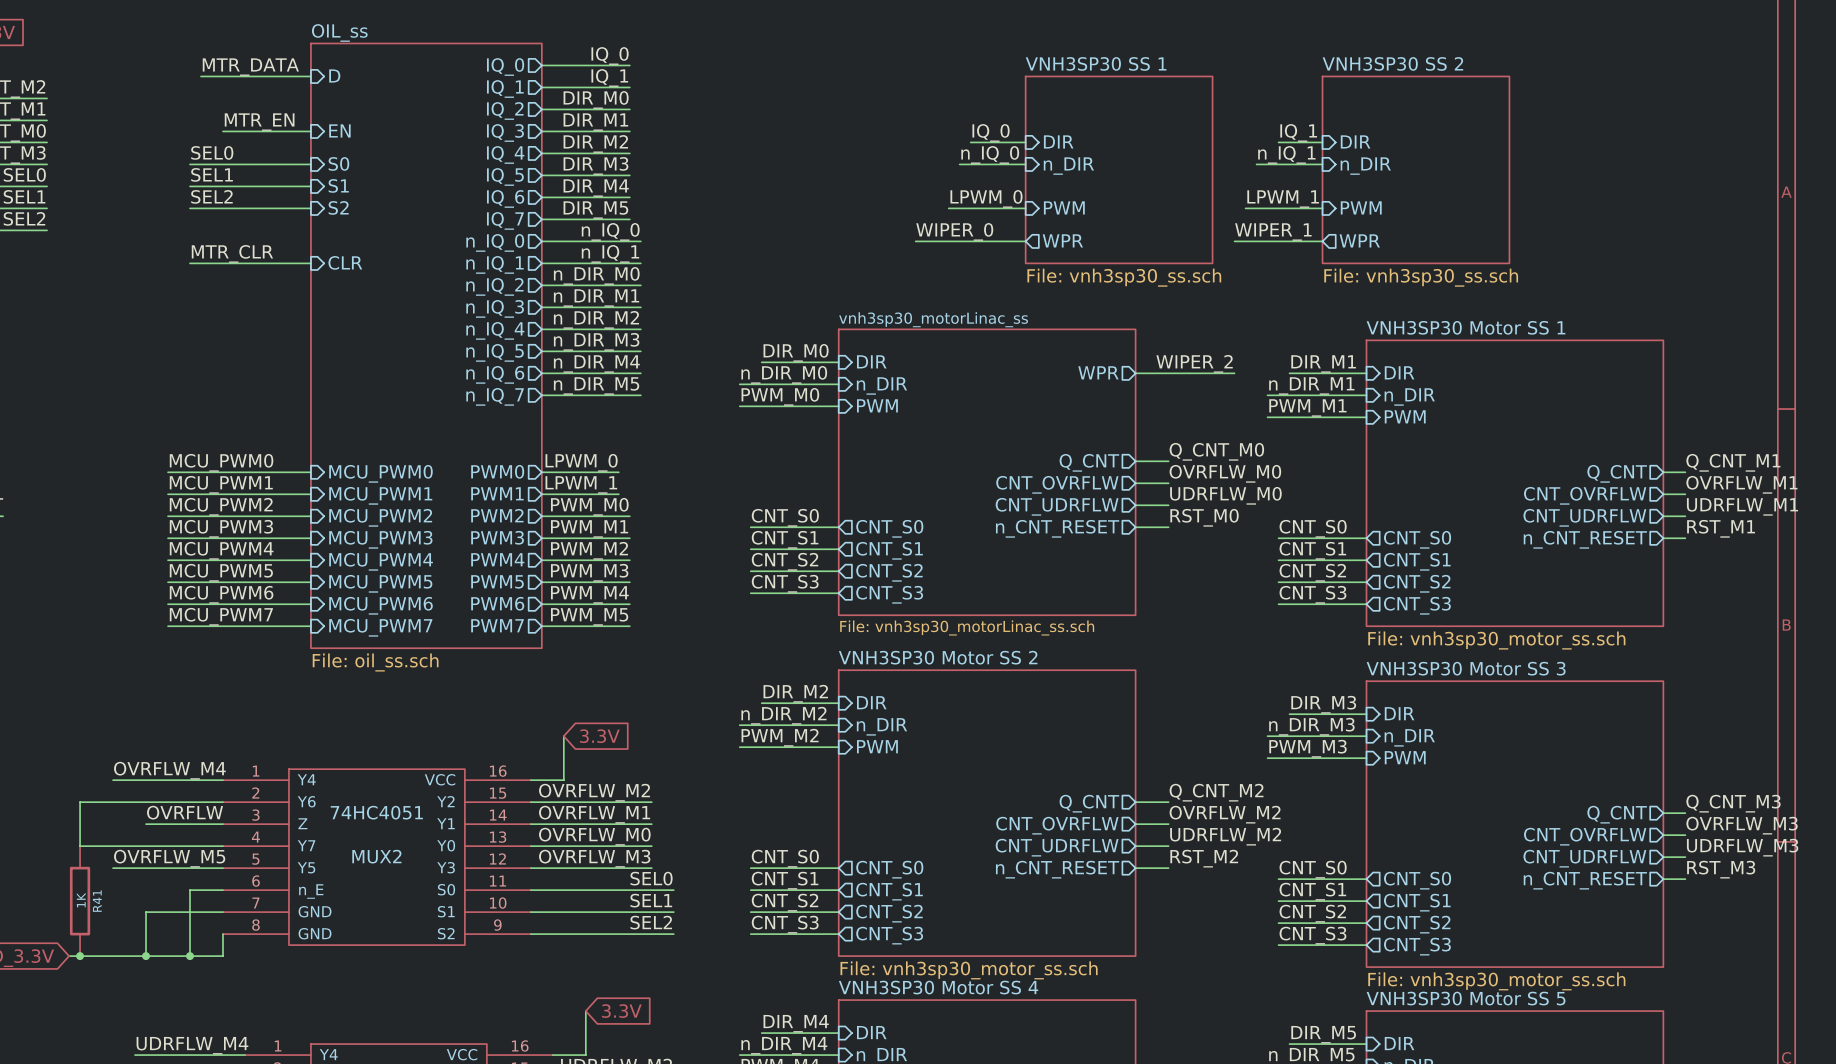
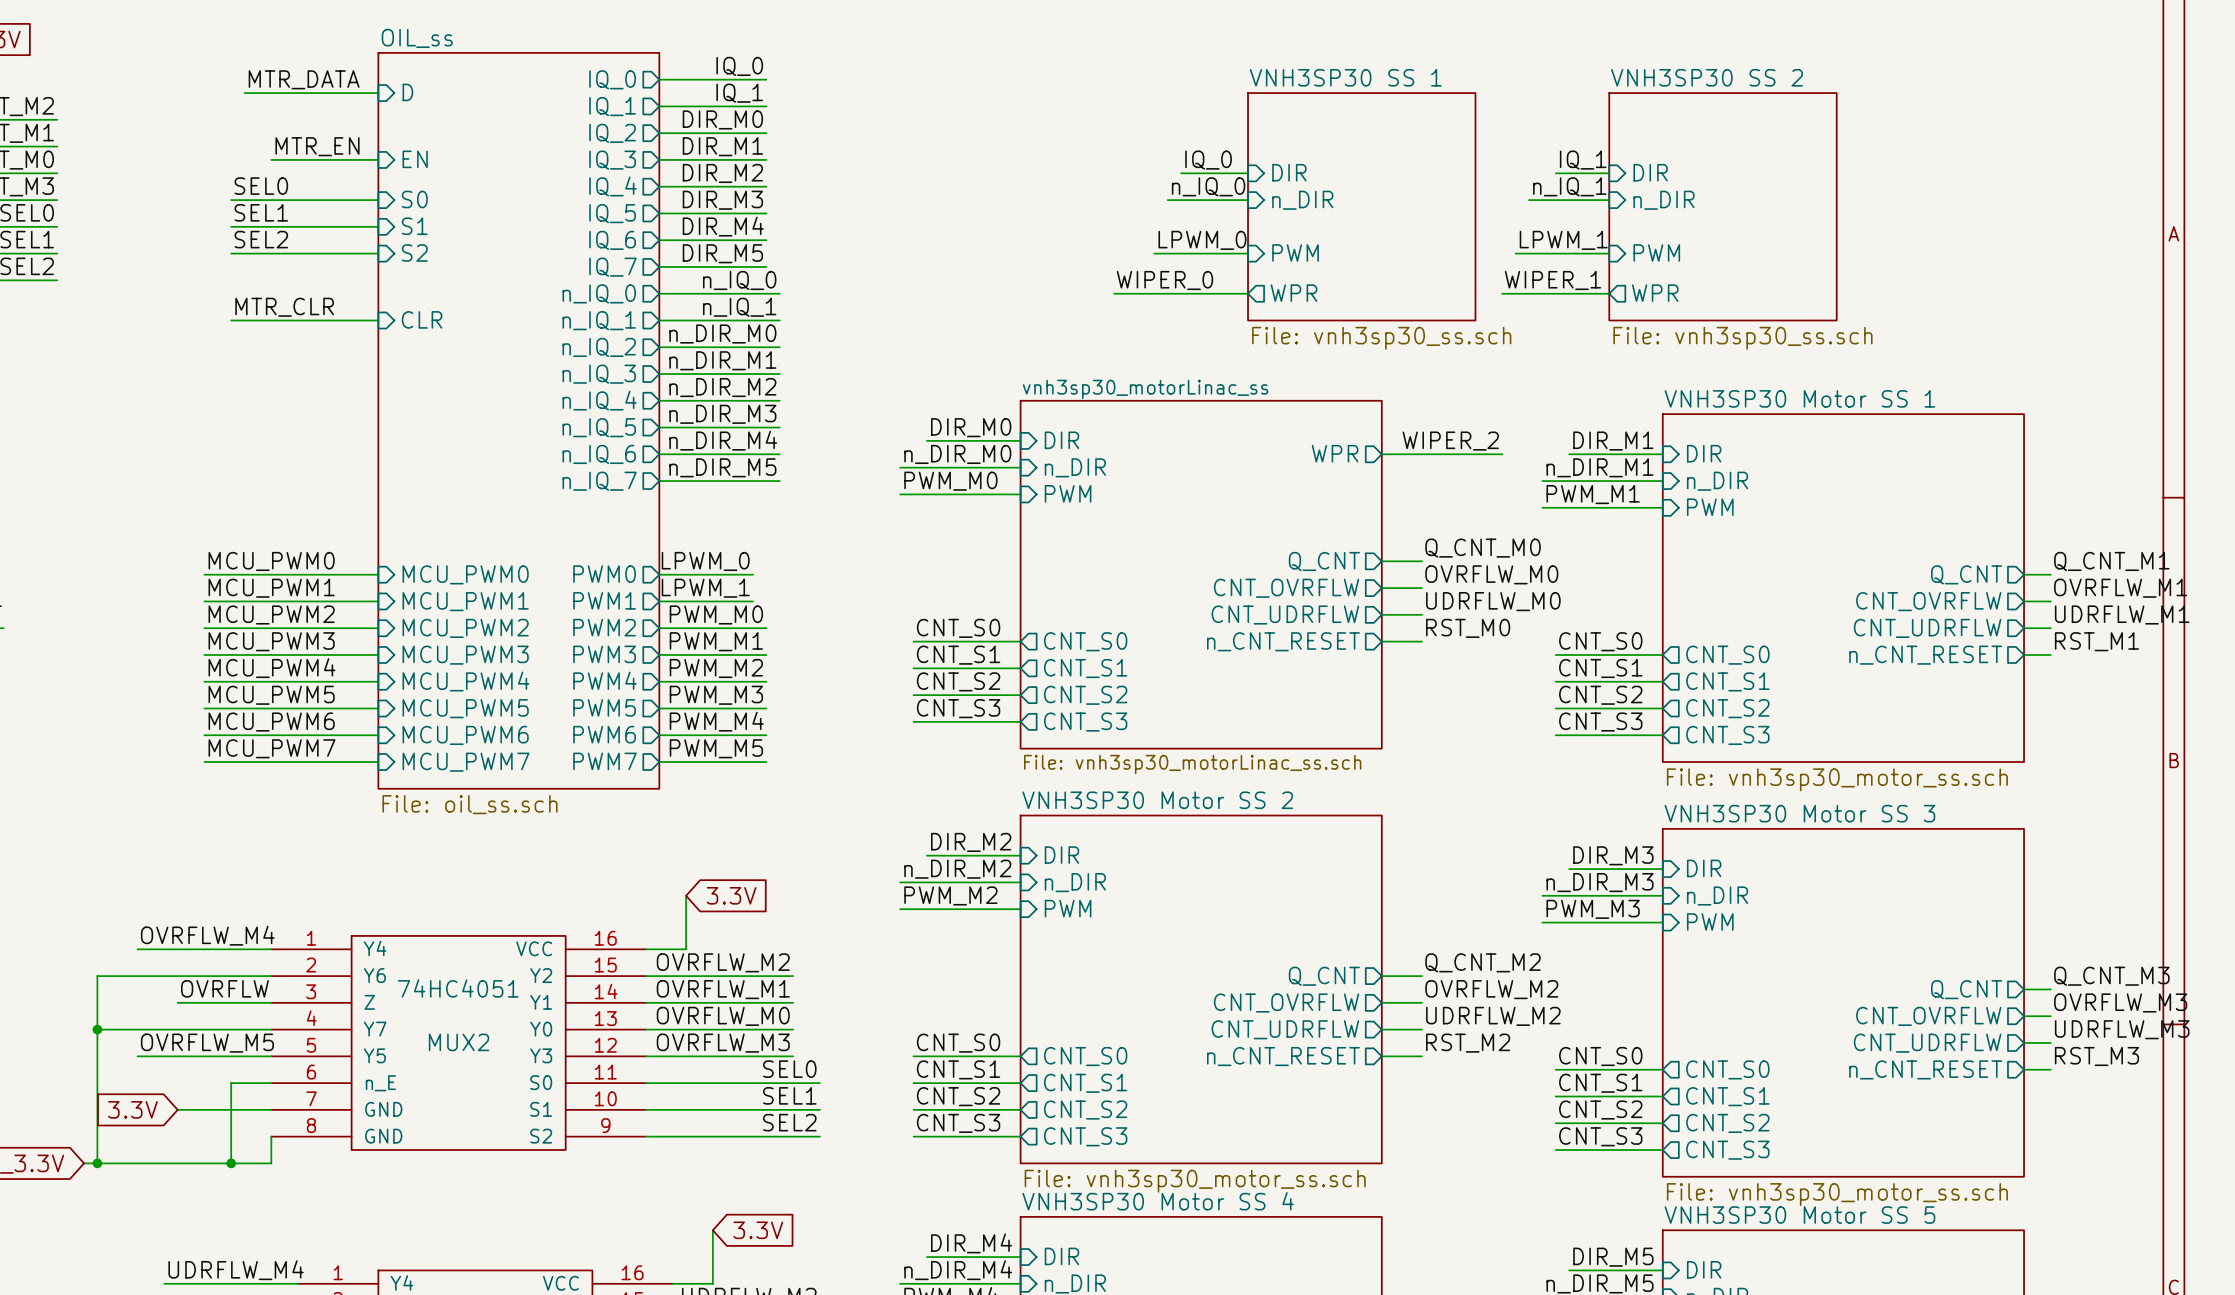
wire: none -> (97, 1029) (97, 1163)
junction: none -> (97, 1029)
R41: 1K (80, 901) -> none
global label: none -> 3.3V (132, 1109)
wire: (146, 912) (146, 956) -> none
junction: (146, 956) -> none

